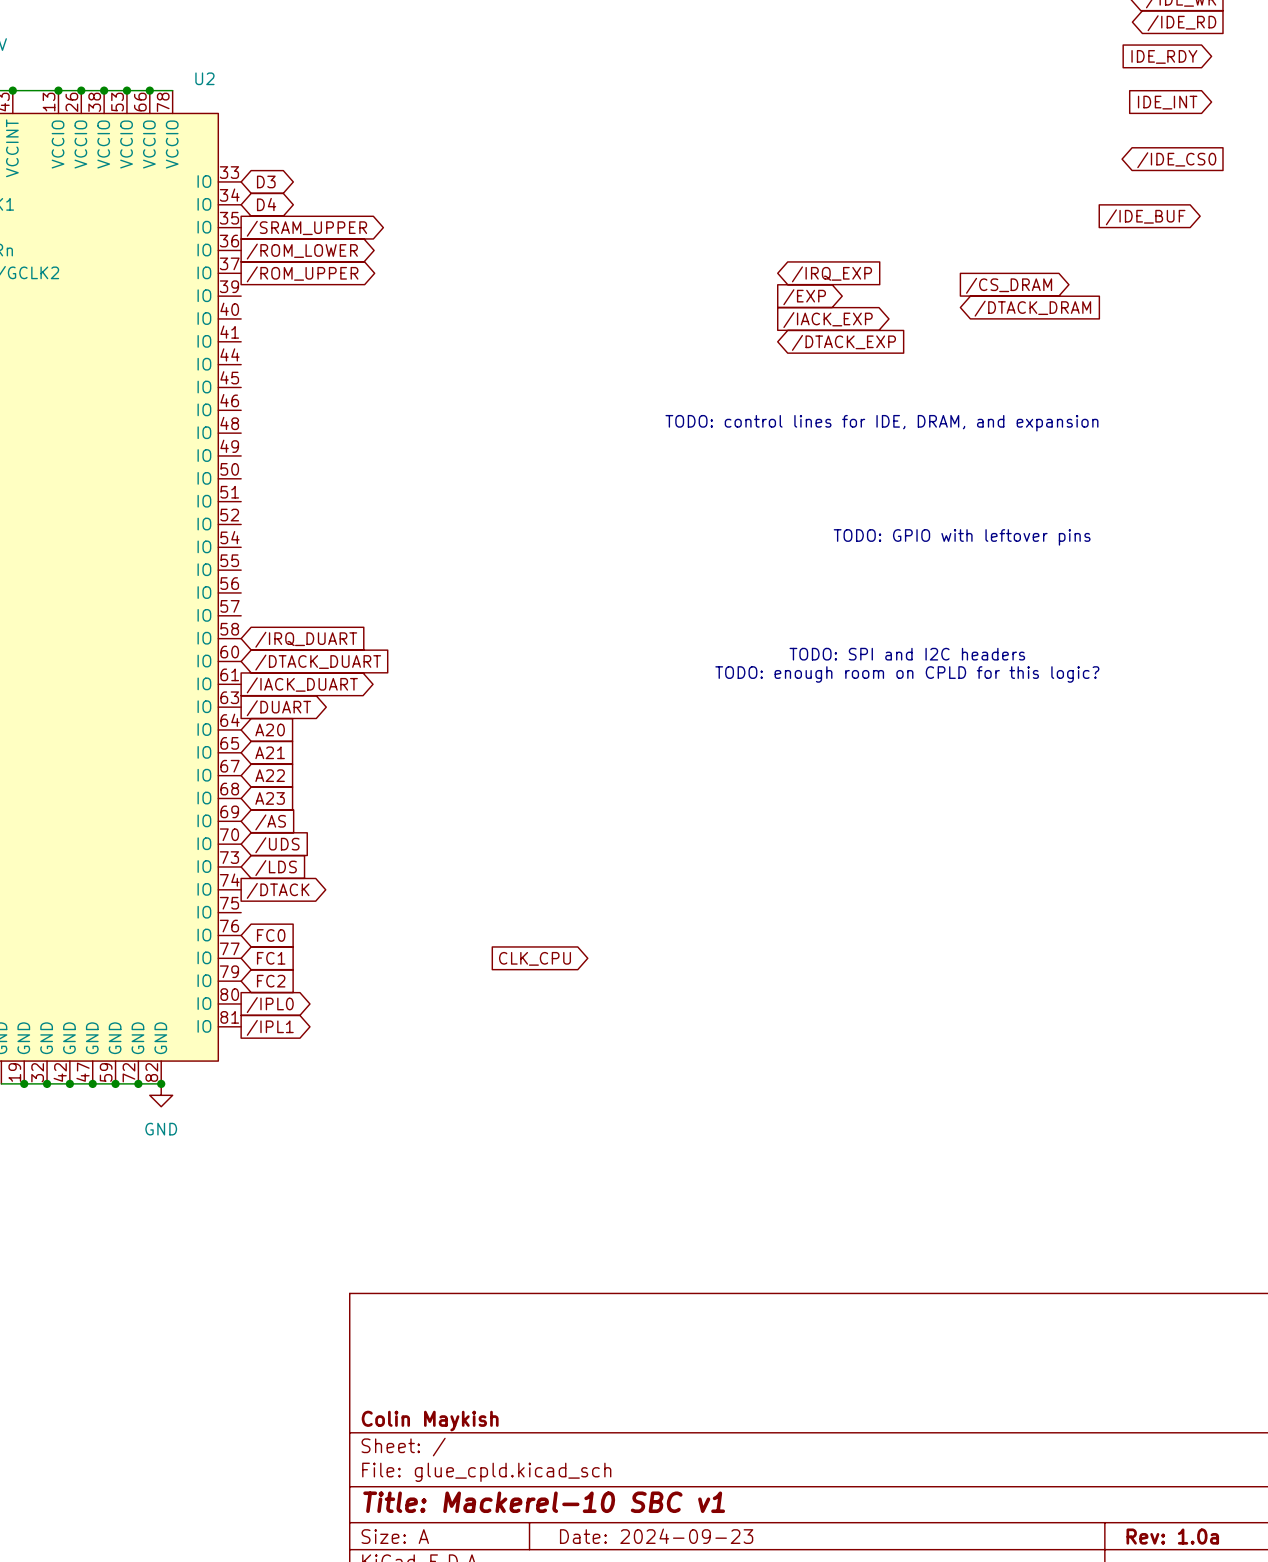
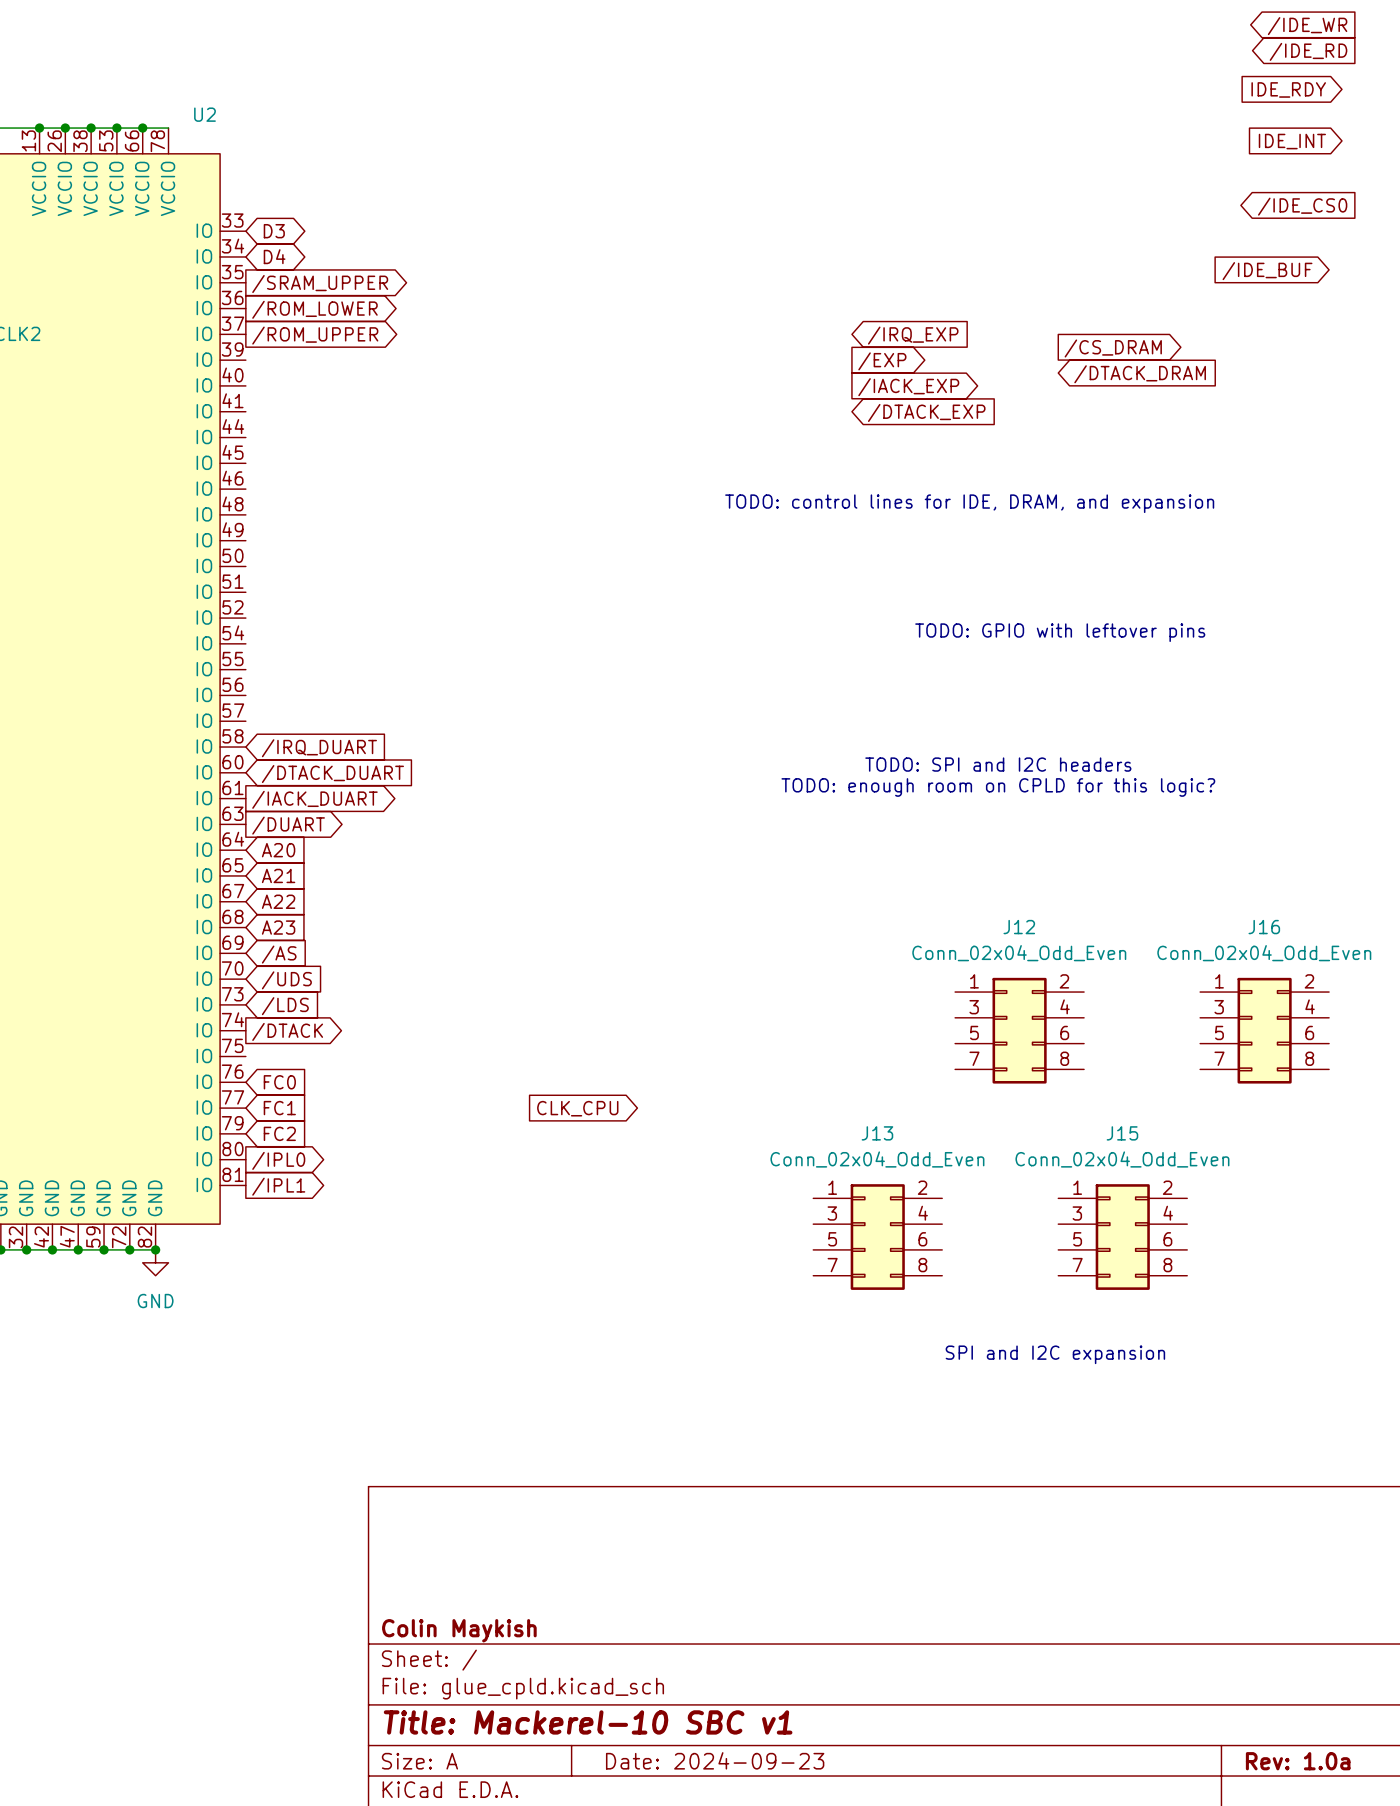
J12: none -> Conn_02x04_Odd_Even (1019, 1030)
J16: none -> Conn_02x04_Odd_Even (1264, 1030)
J13: none -> Conn_02x04_Odd_Even (877, 1237)
J15: none -> Conn_02x04_Odd_Even (1122, 1237)
text: none -> SPI and I2C expansion (1055, 1354)

